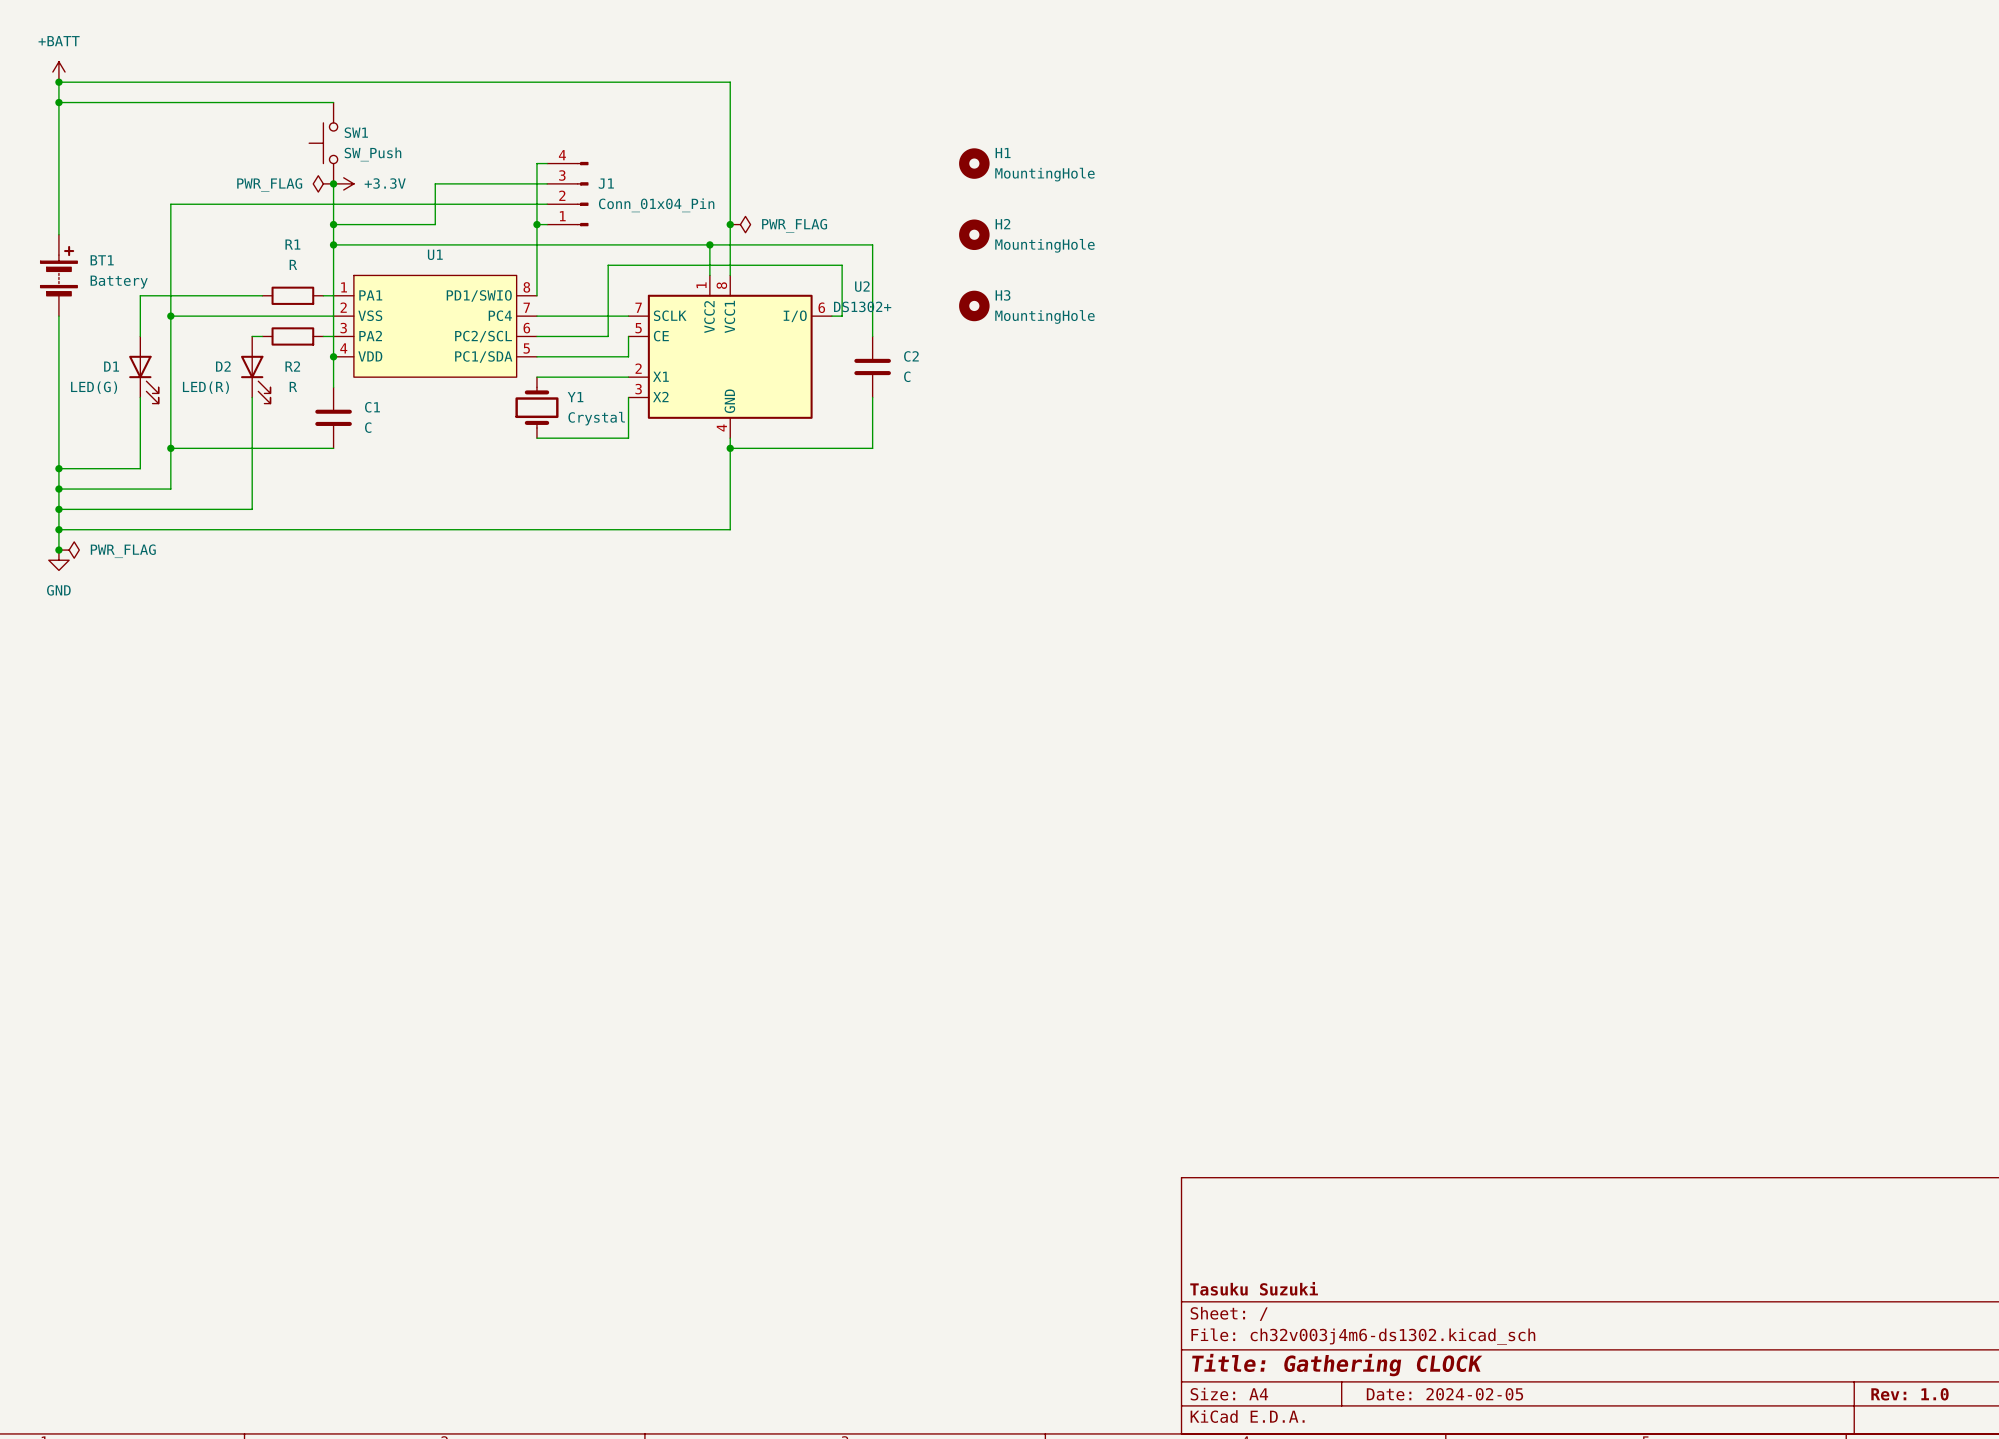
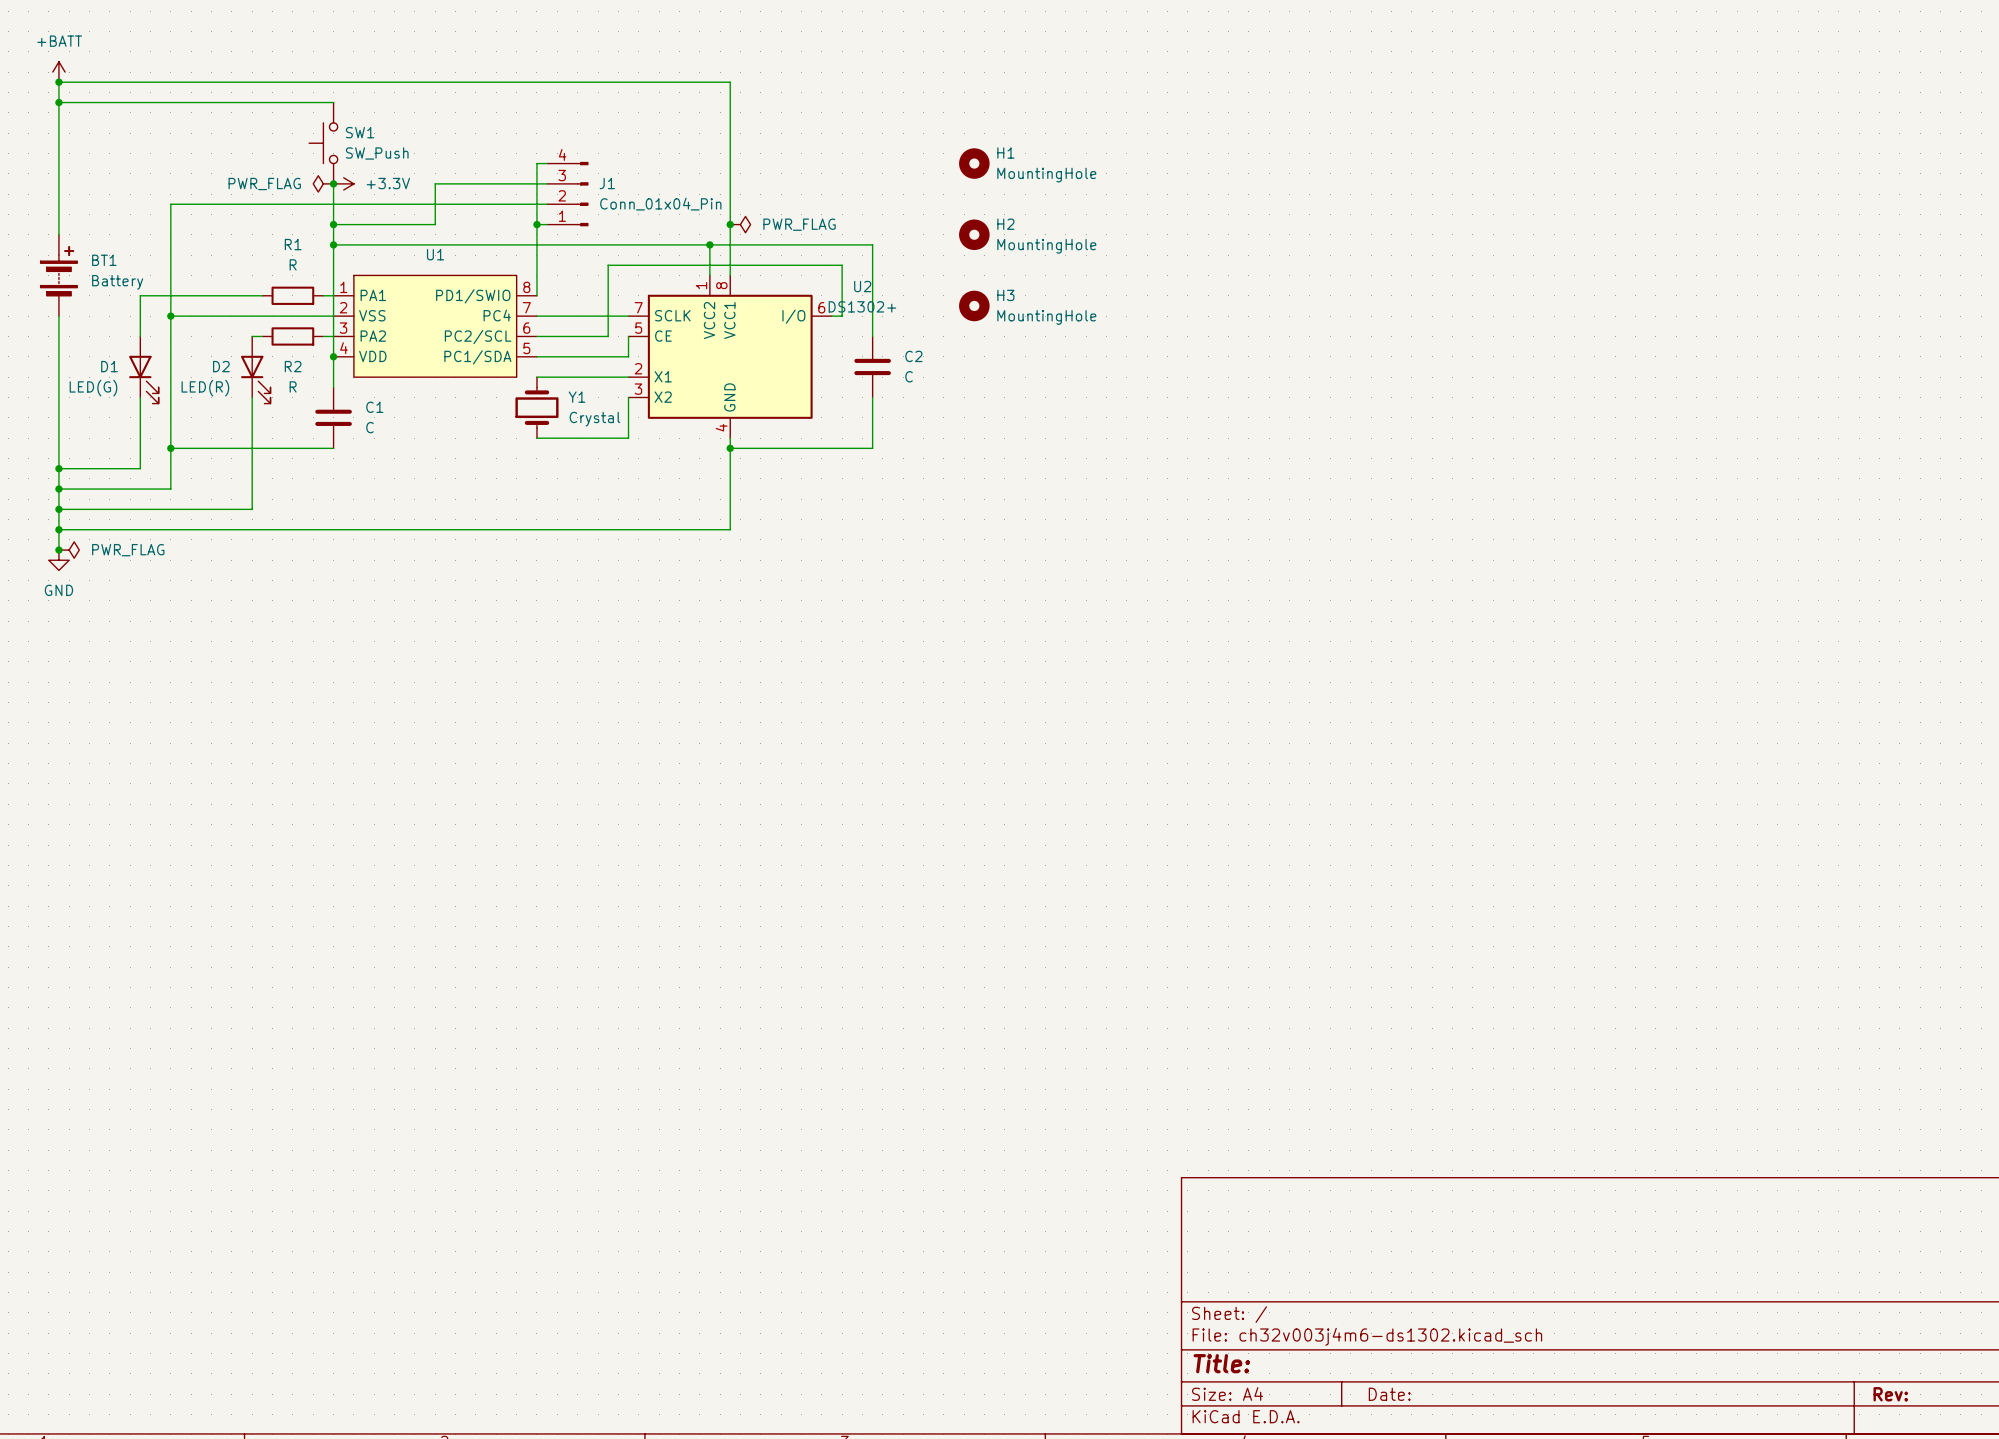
title block: Tasuku Suzuki (1254, 1288) -> none
title block: Title: Gathering CLOCK (1337, 1365) -> Title: (1221, 1363)
title block: Date: 2024-02-05 (1444, 1394) -> Date: (1389, 1394)
title block: Rev: 1.0 (1909, 1394) -> Rev: (1890, 1394)

